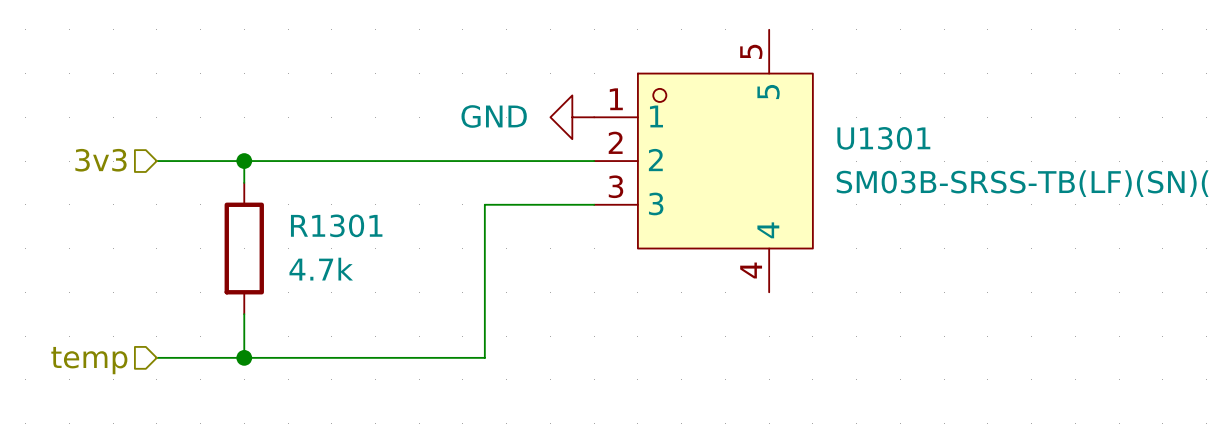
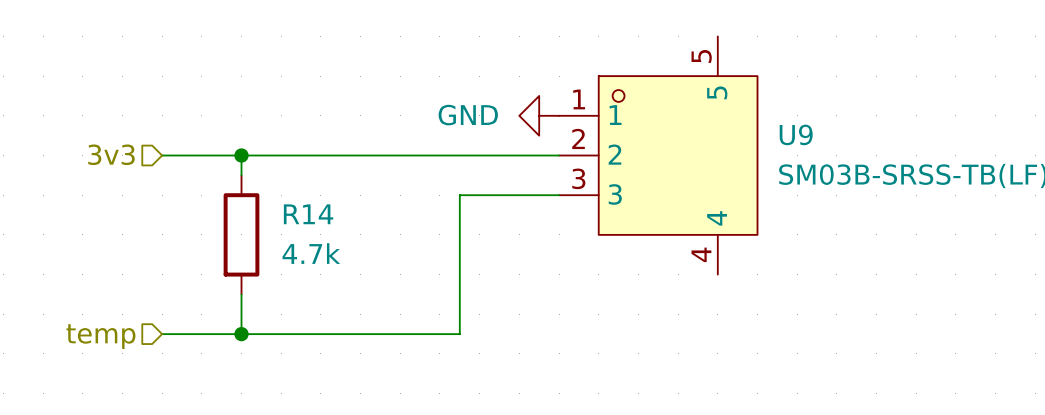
U1301 name: U1301 (883, 138) -> U9 (796, 134)
R1301 name: R1301 (336, 225) -> R14 (308, 214)

